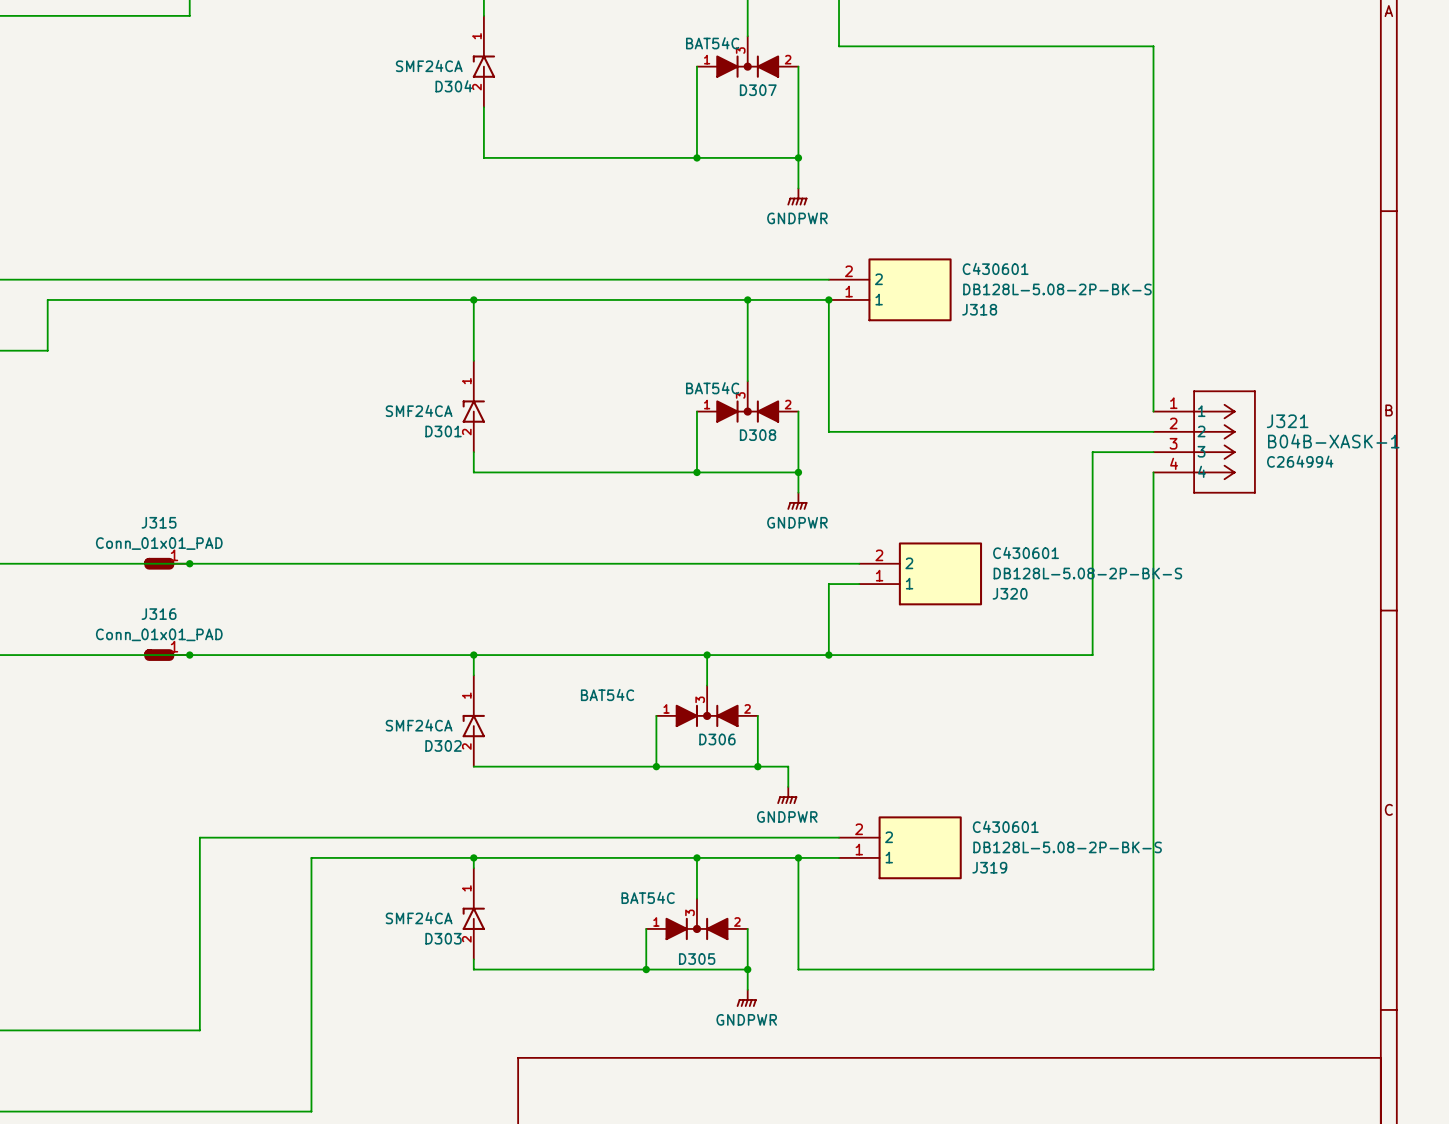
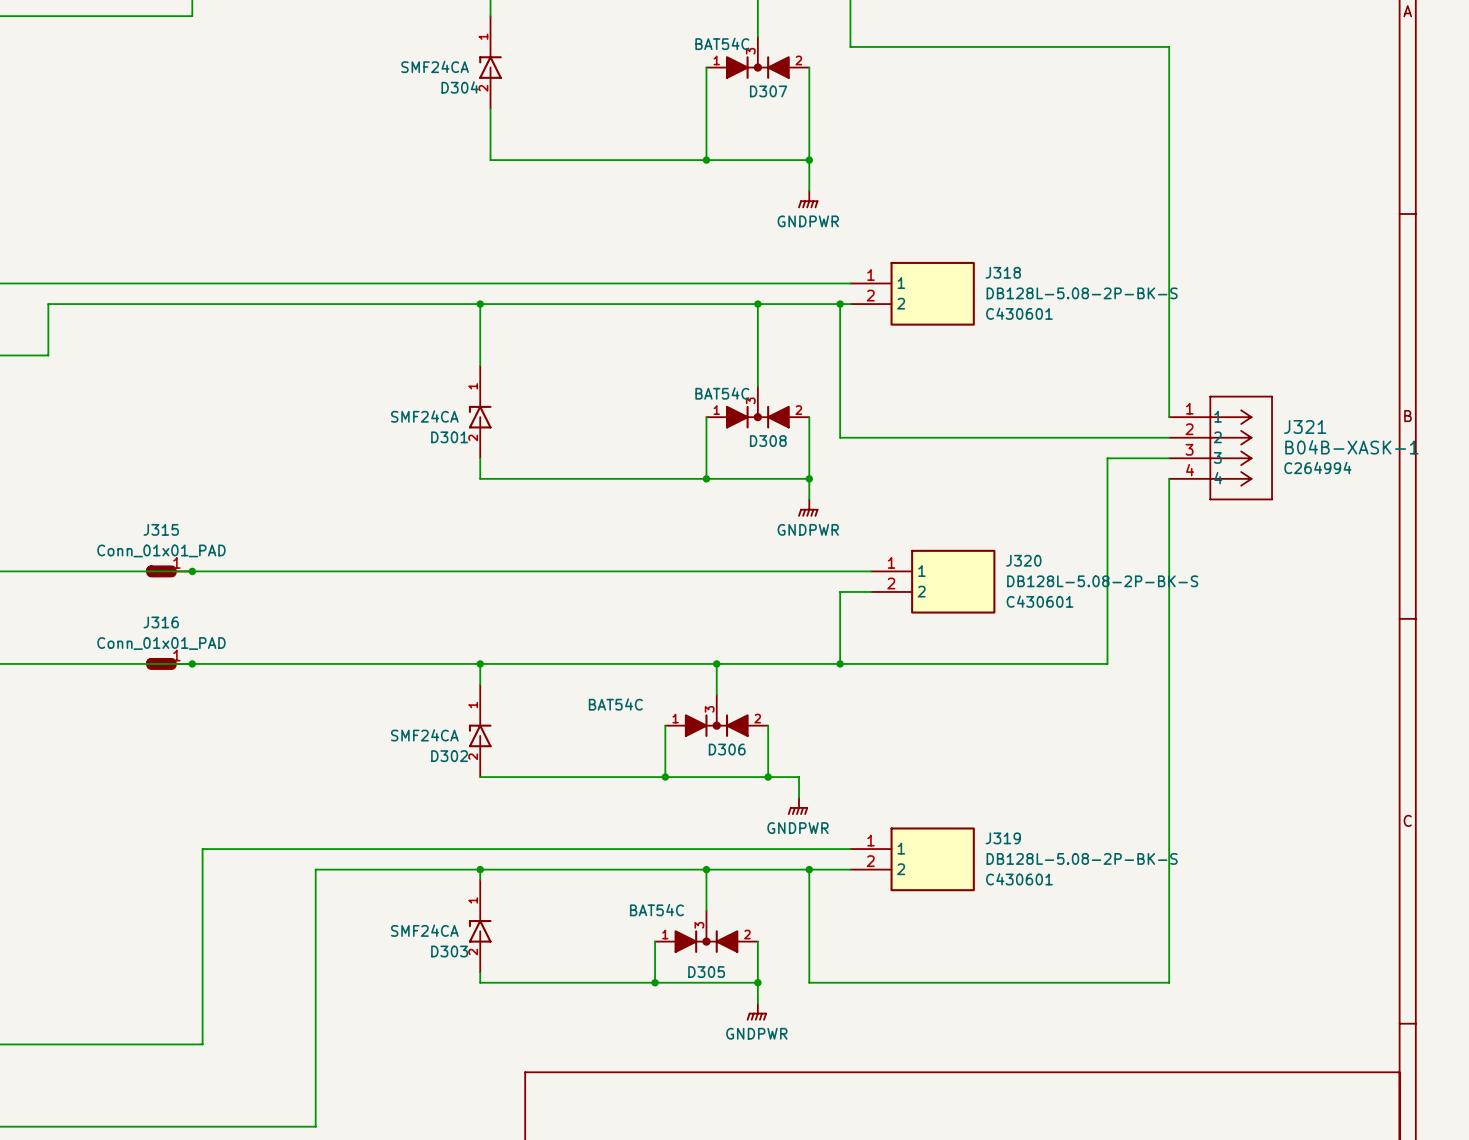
J318 flip: as is (910, 289) -> up-down (932, 293)
J320 flip: as is (940, 573) -> up-down (953, 581)
J319 flip: as is (920, 847) -> up-down (932, 859)

